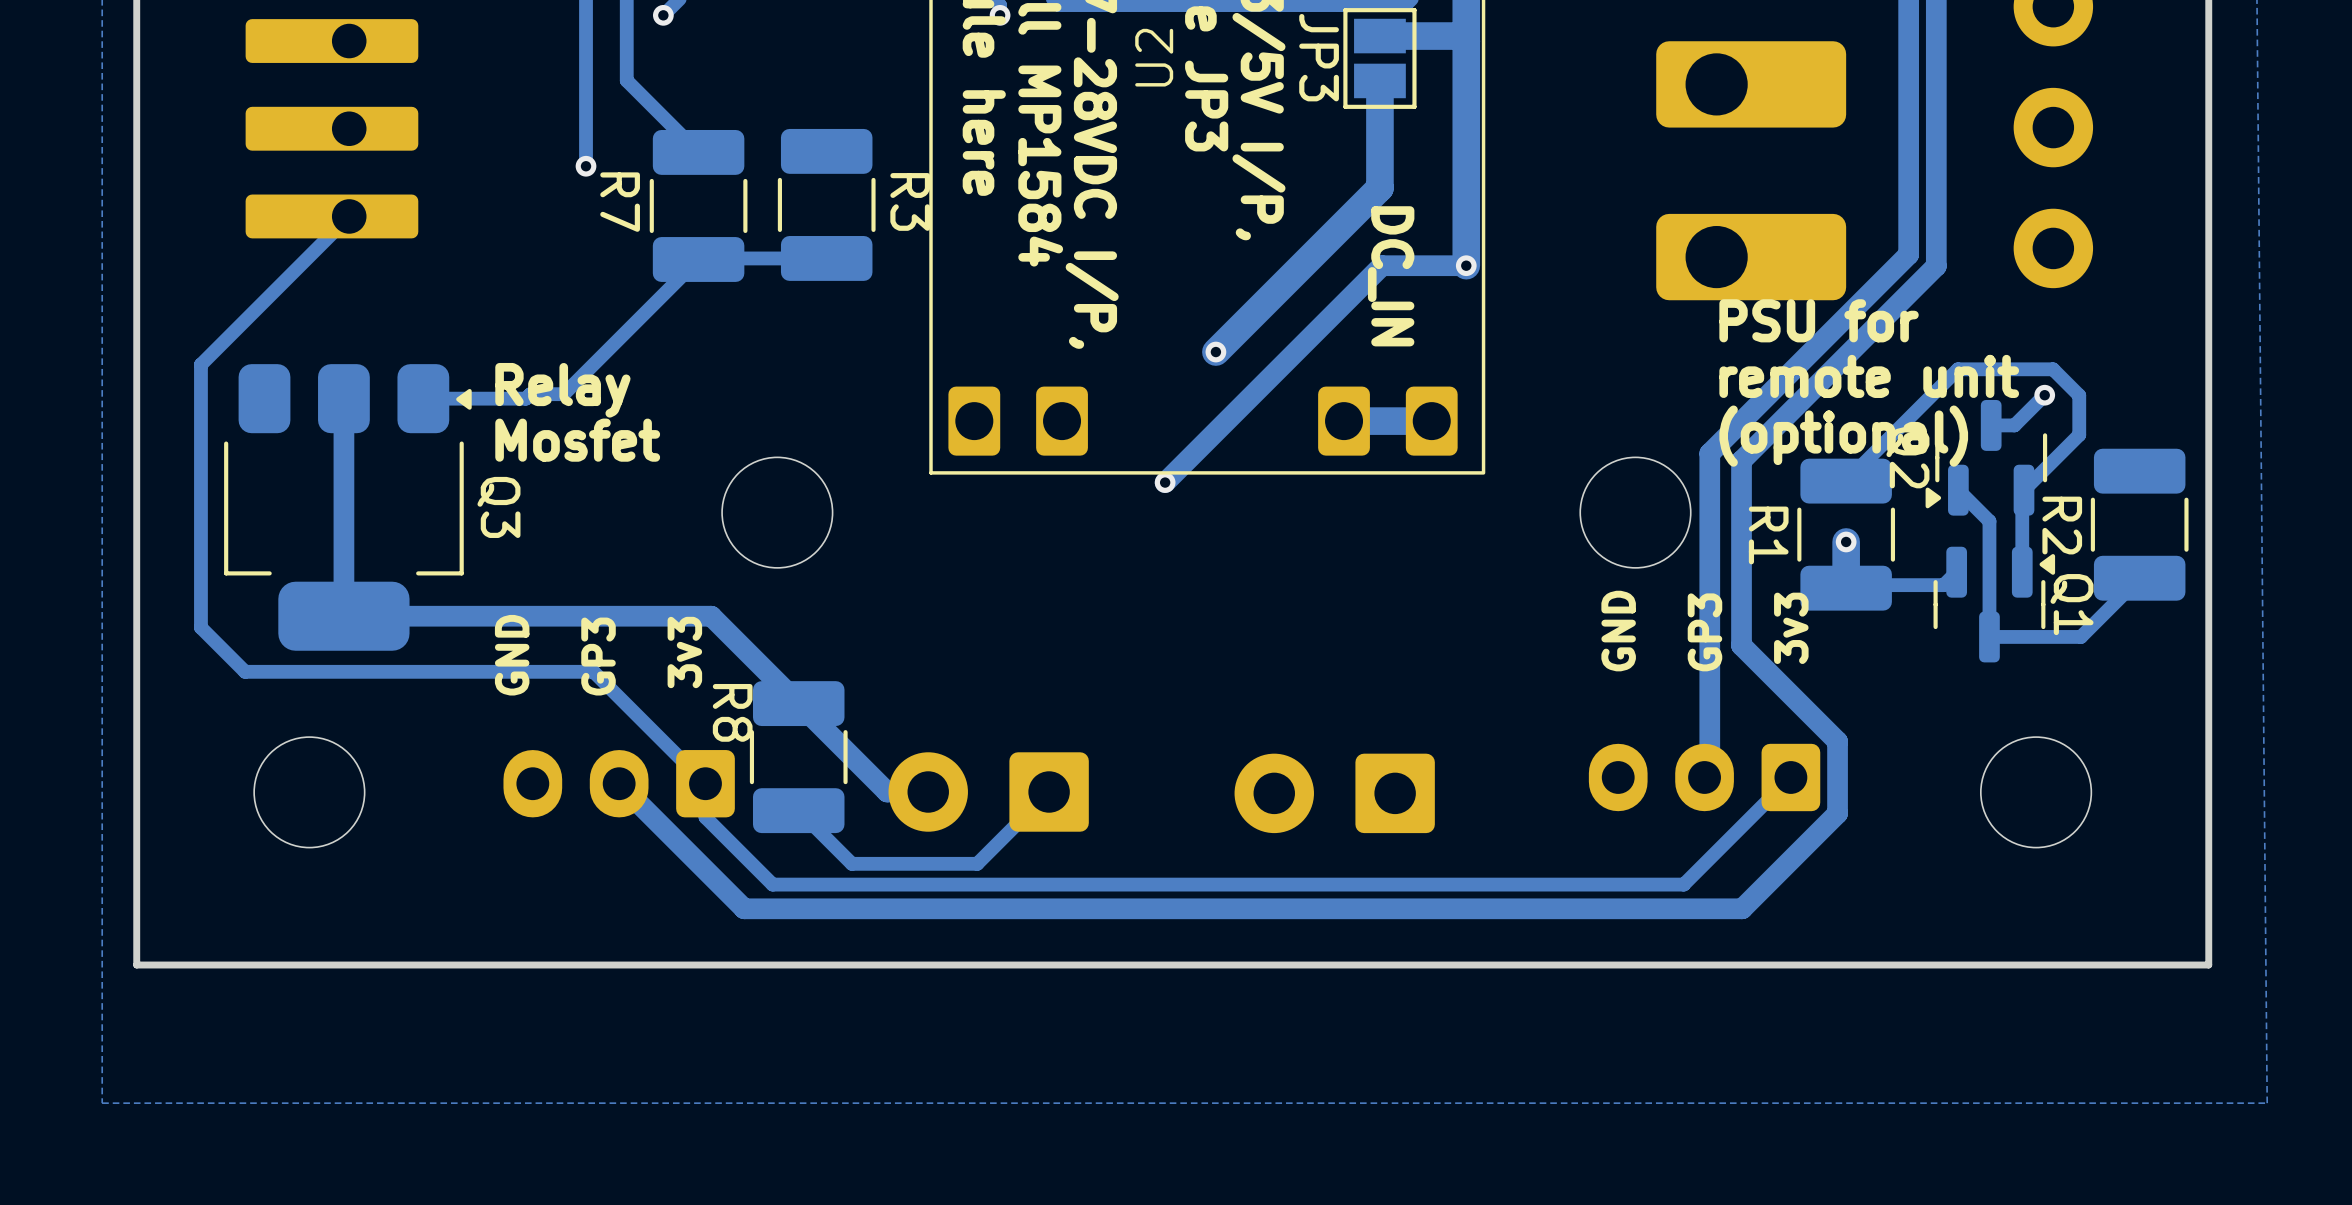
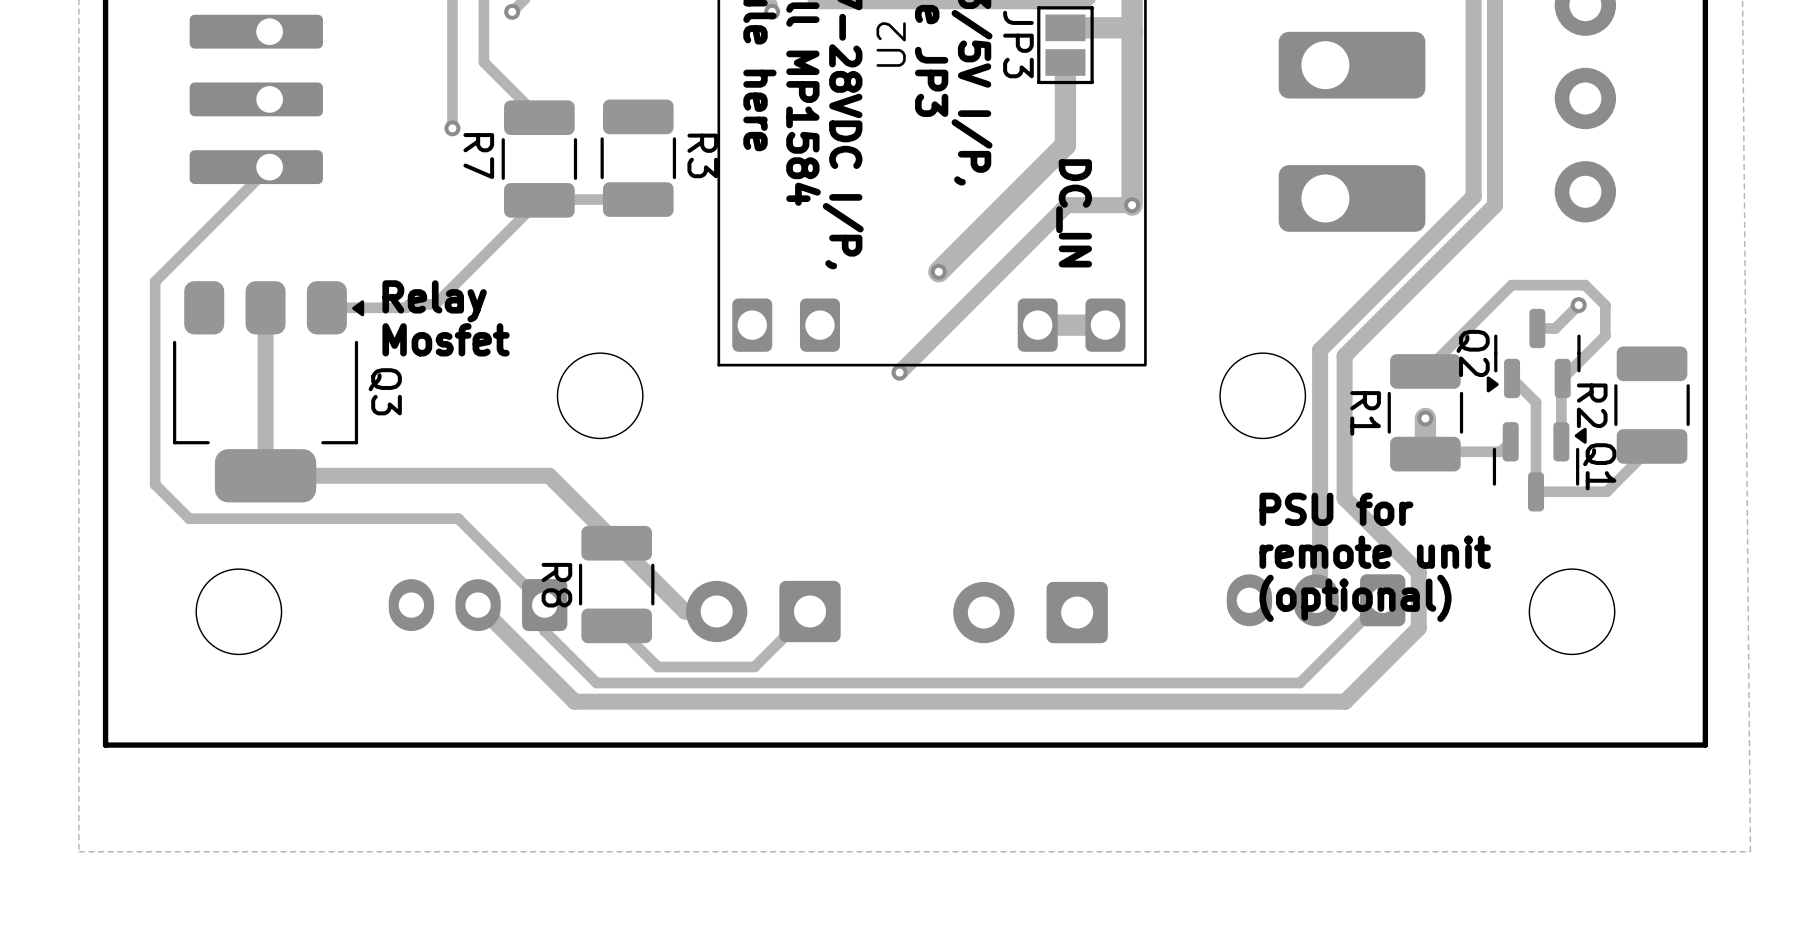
text position: PSU for (1819, 320) -> PSU for (1336, 509)
text position: remote unit (1869, 376) -> remote unit (1375, 552)
text position: (optional) (1843, 436) -> (optional) (1355, 598)
text: 3v3 (1791, 628) -> none
text: GND (1618, 631) -> none
text: GP3 (1704, 632) -> none
text: 3v3 (684, 652) -> none
text: GND (512, 655) -> none
text: GP3 (598, 656) -> none
R8 name position: R8 (732, 712) -> R8 (556, 585)

